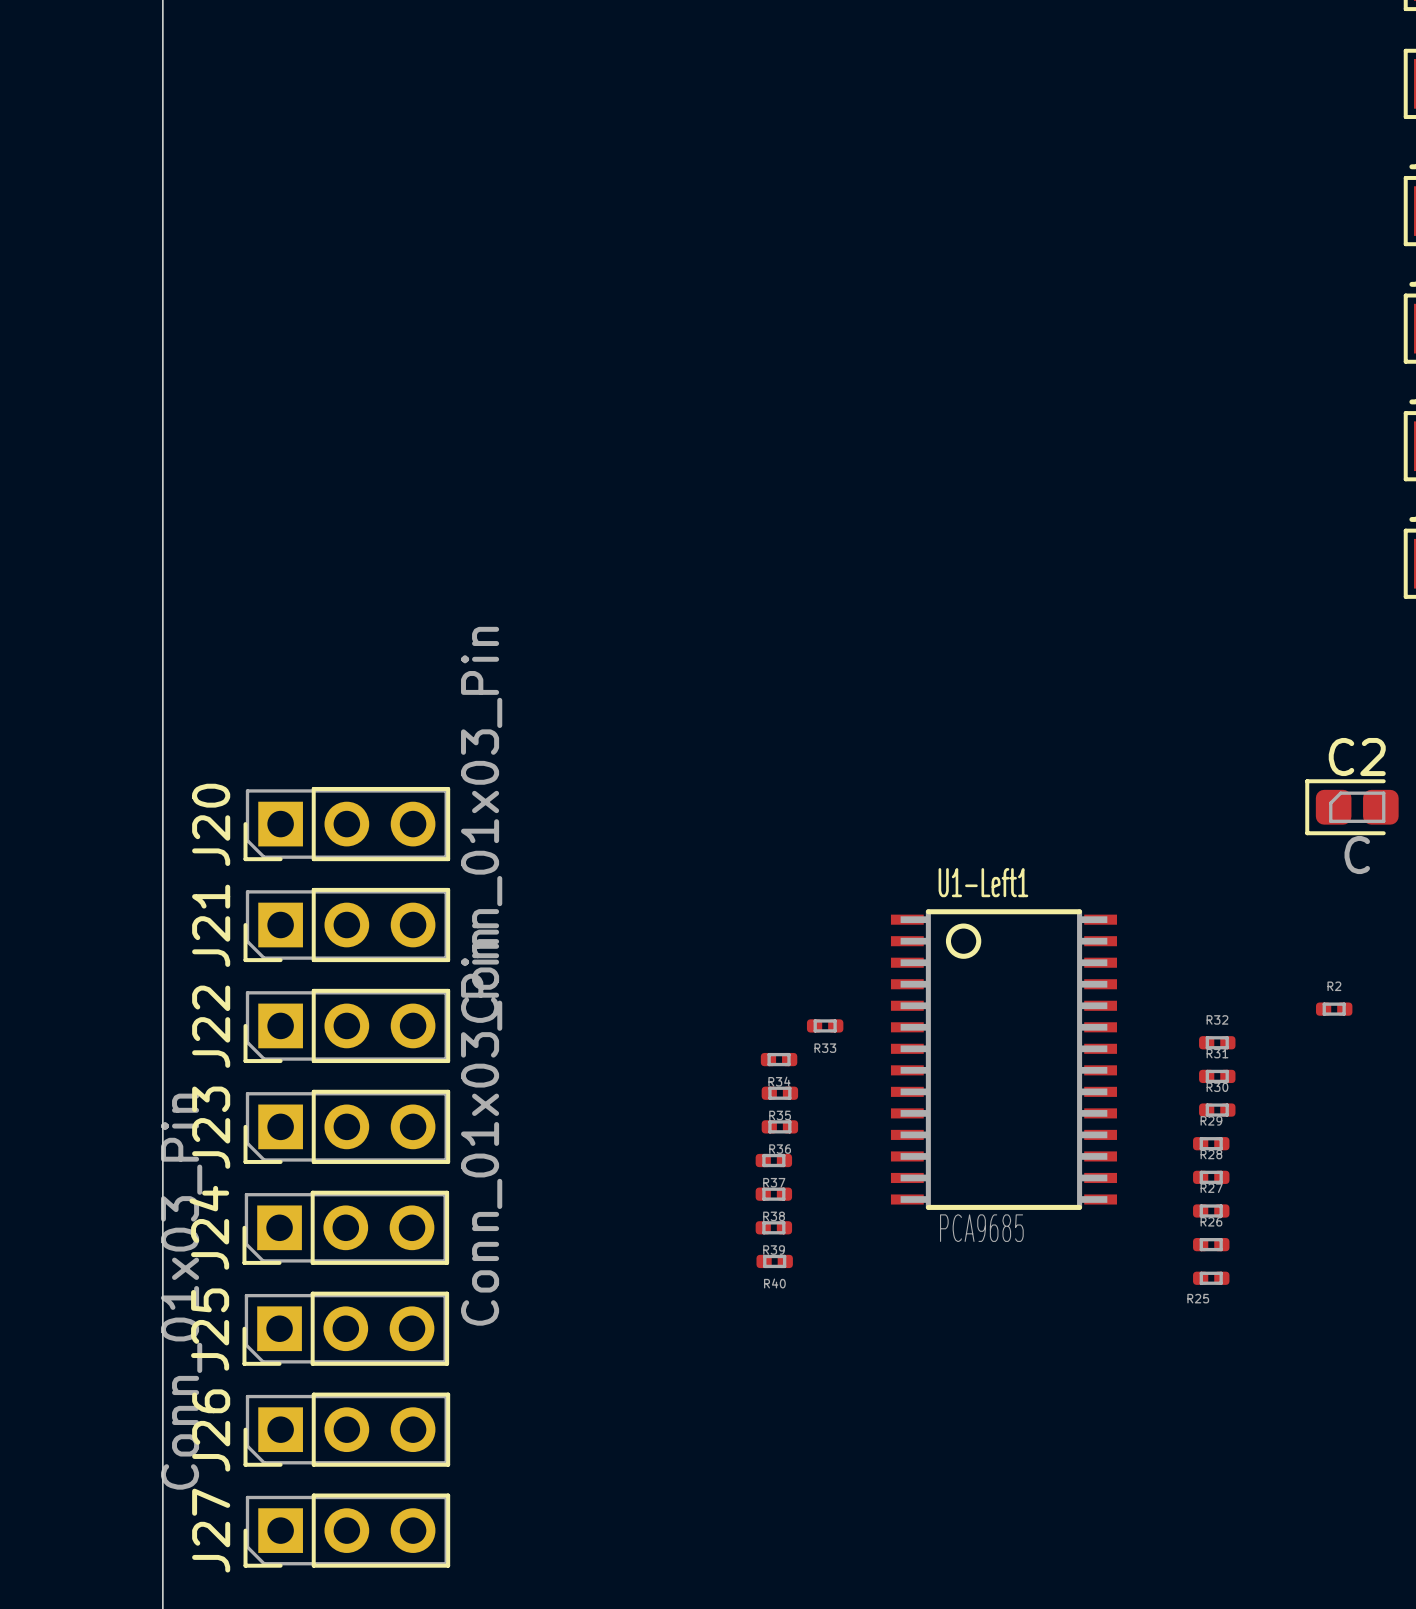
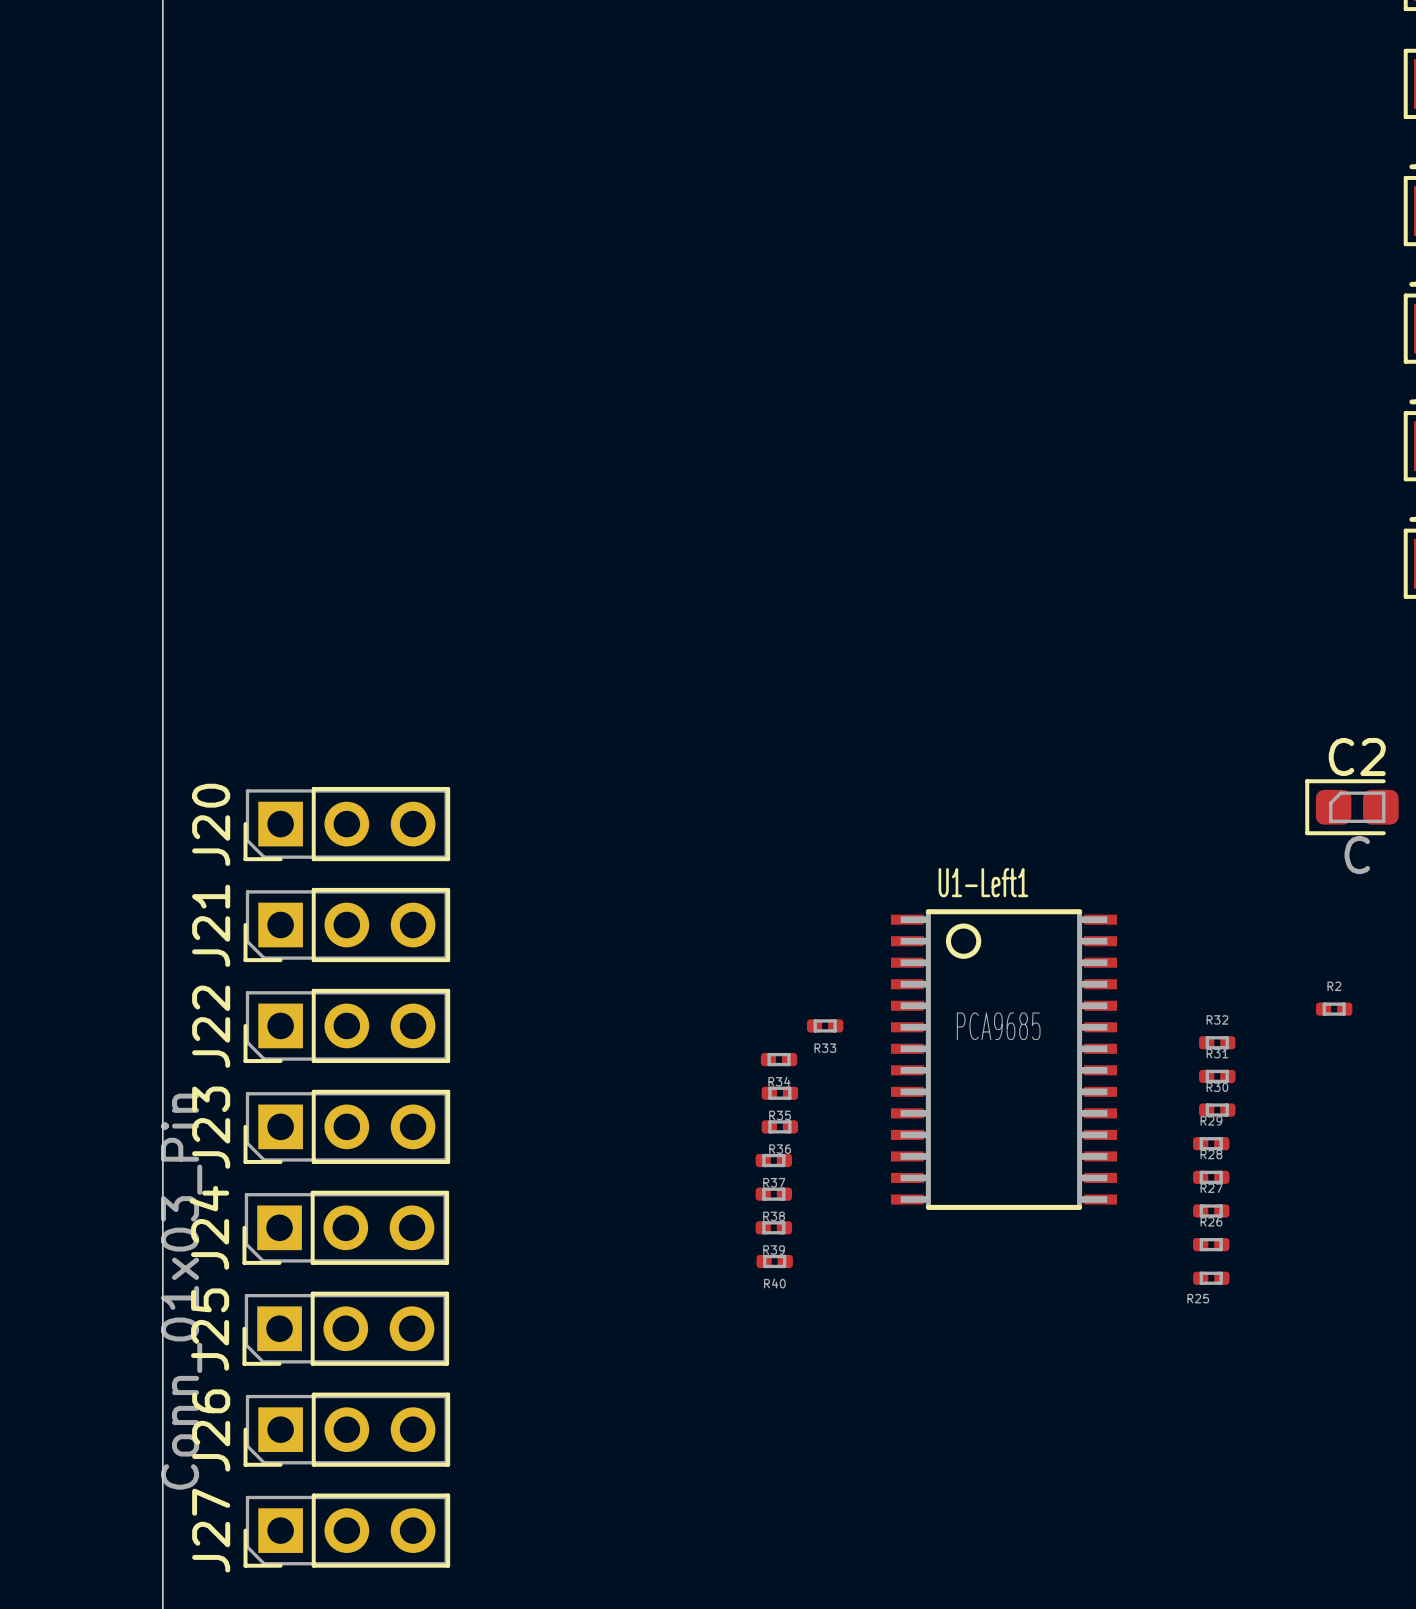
J20 value: Conn_01x03_Pin (481, 824) -> none
J23 value: Conn_01x03_Pin (481, 1127) -> none
U1-Left1 value position: PCA9685 (981, 1228) -> PCA9685 (998, 1026)

